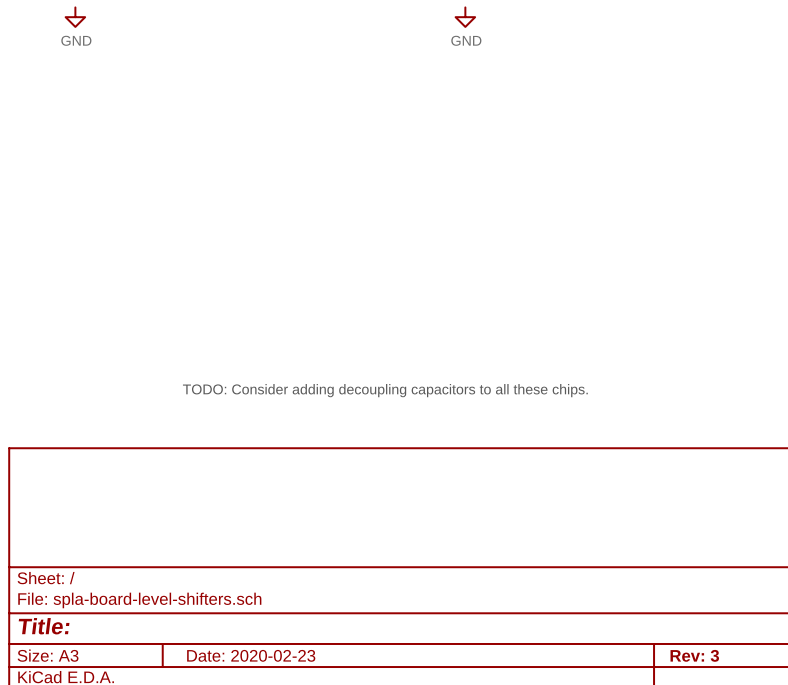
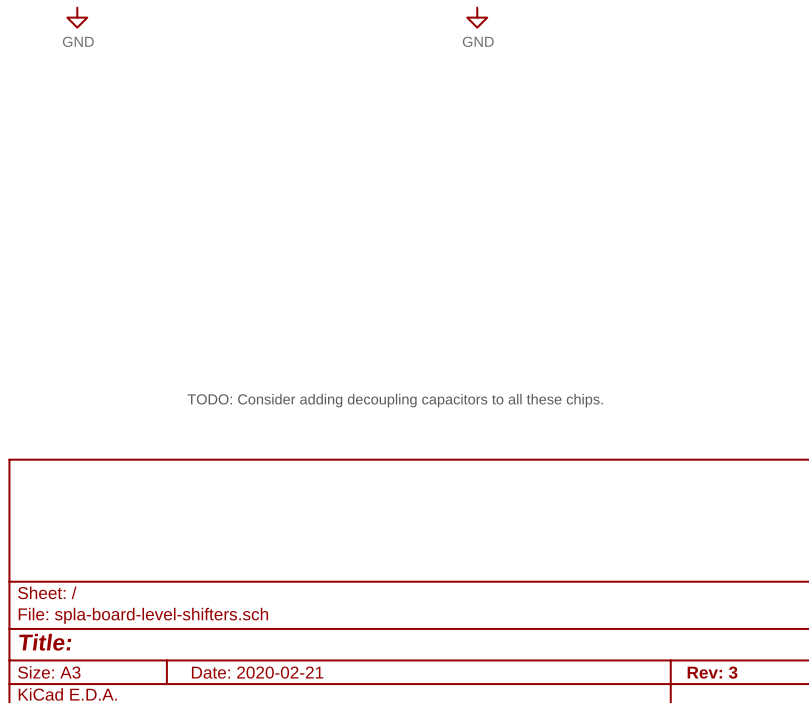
title block: Date: 2020-02-23 (251, 655) -> Date: 2020-02-21 (257, 672)

